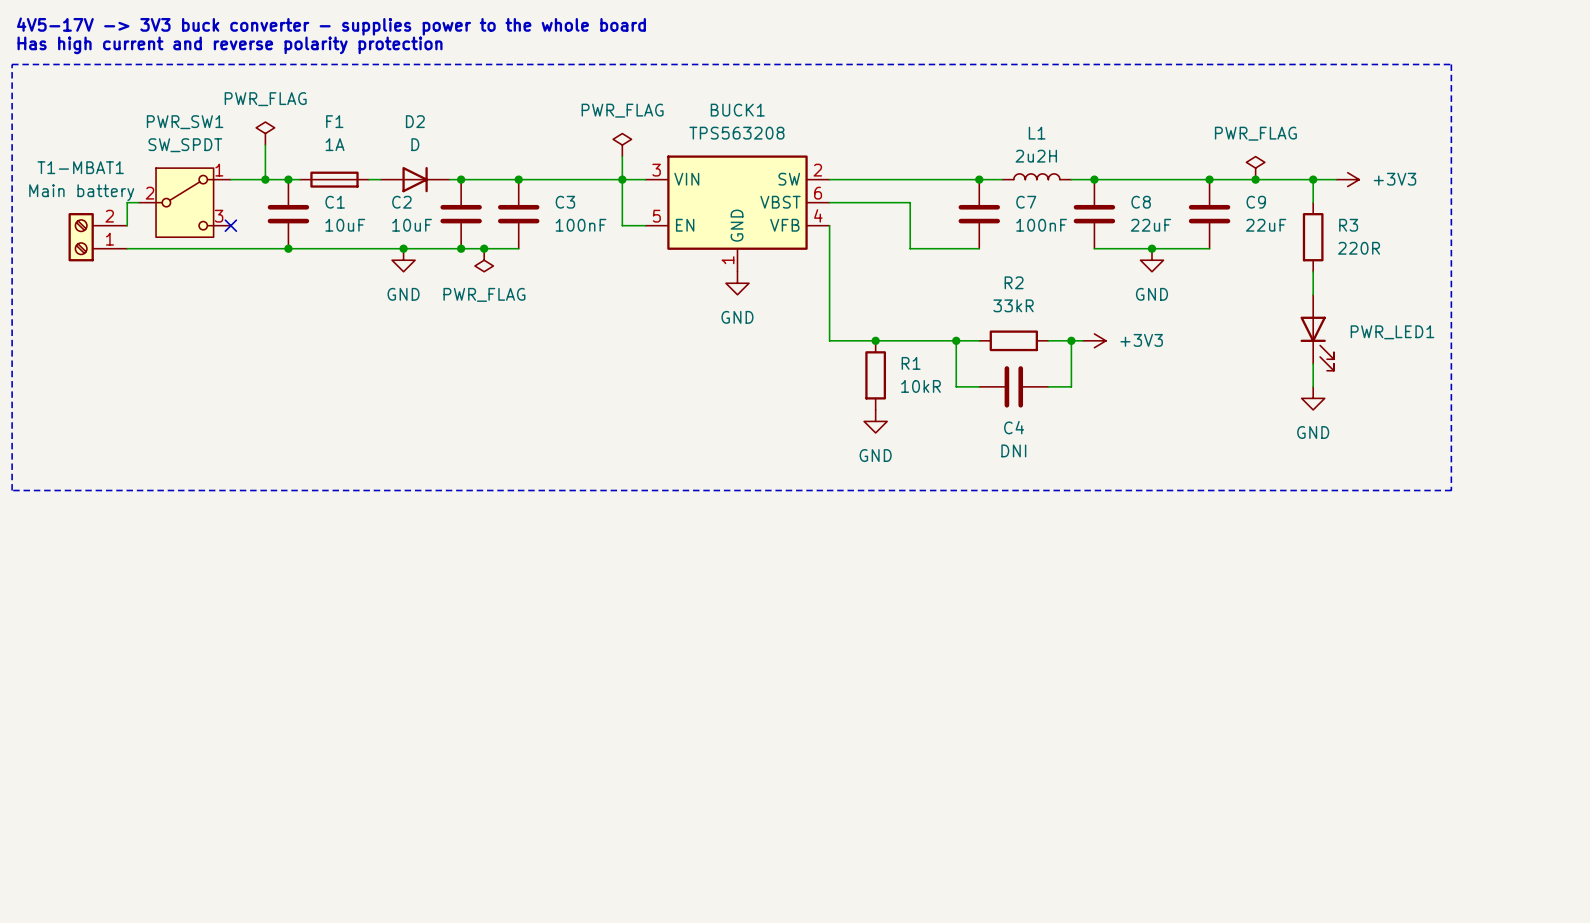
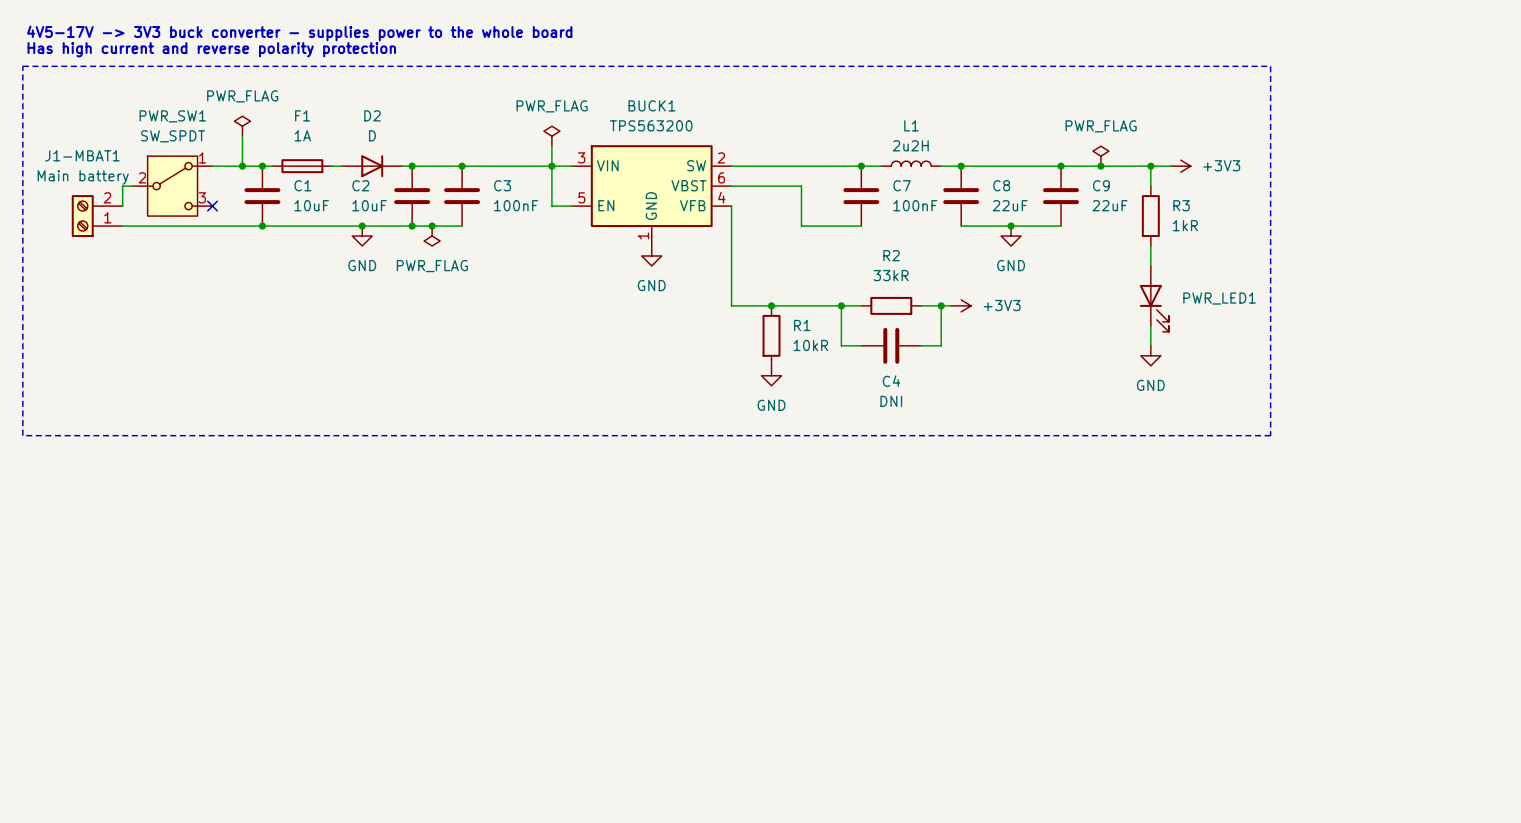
BUCK1 value: TPS563208 (736, 133) -> TPS563200 (651, 125)
T1-MBAT1 name: T1-MBAT1 (80, 167) -> J1-MBAT1 (82, 155)
R3 value: 220R (1359, 248) -> 1kR (1185, 225)

